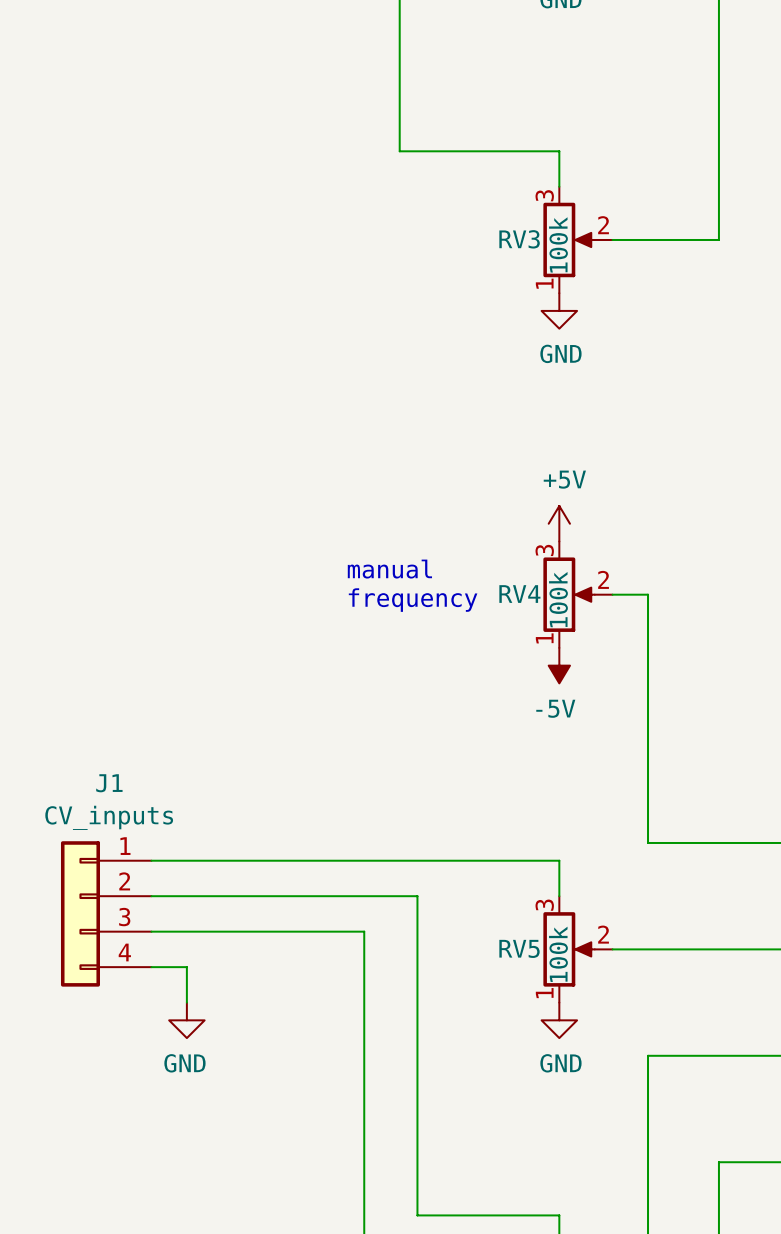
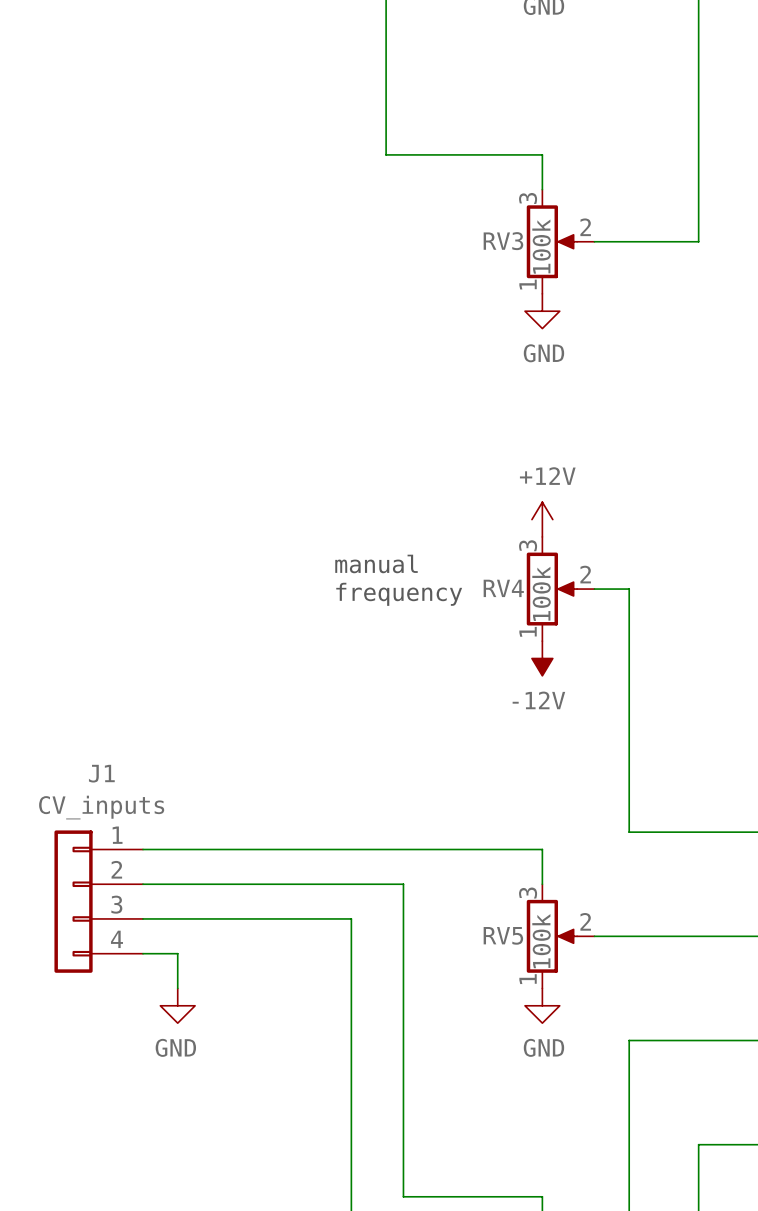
power symbol: +5V (559, 523) -> +12V (542, 519)
power symbol: -5V (559, 665) -> -12V (542, 658)

